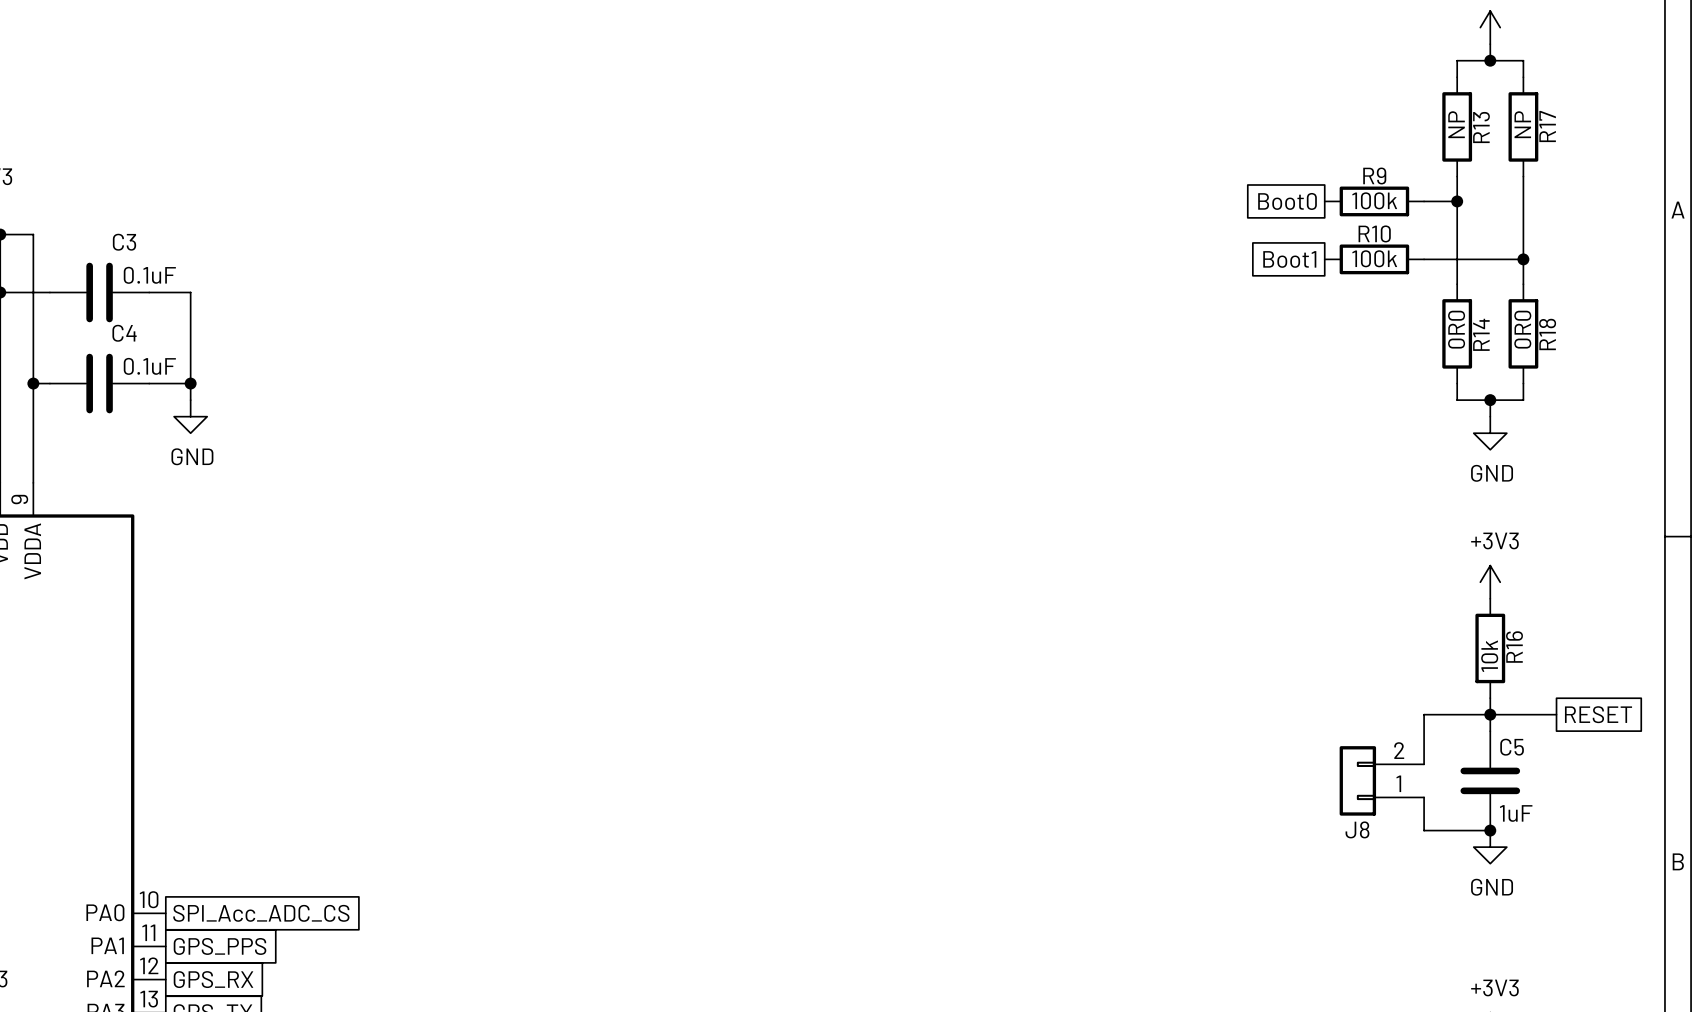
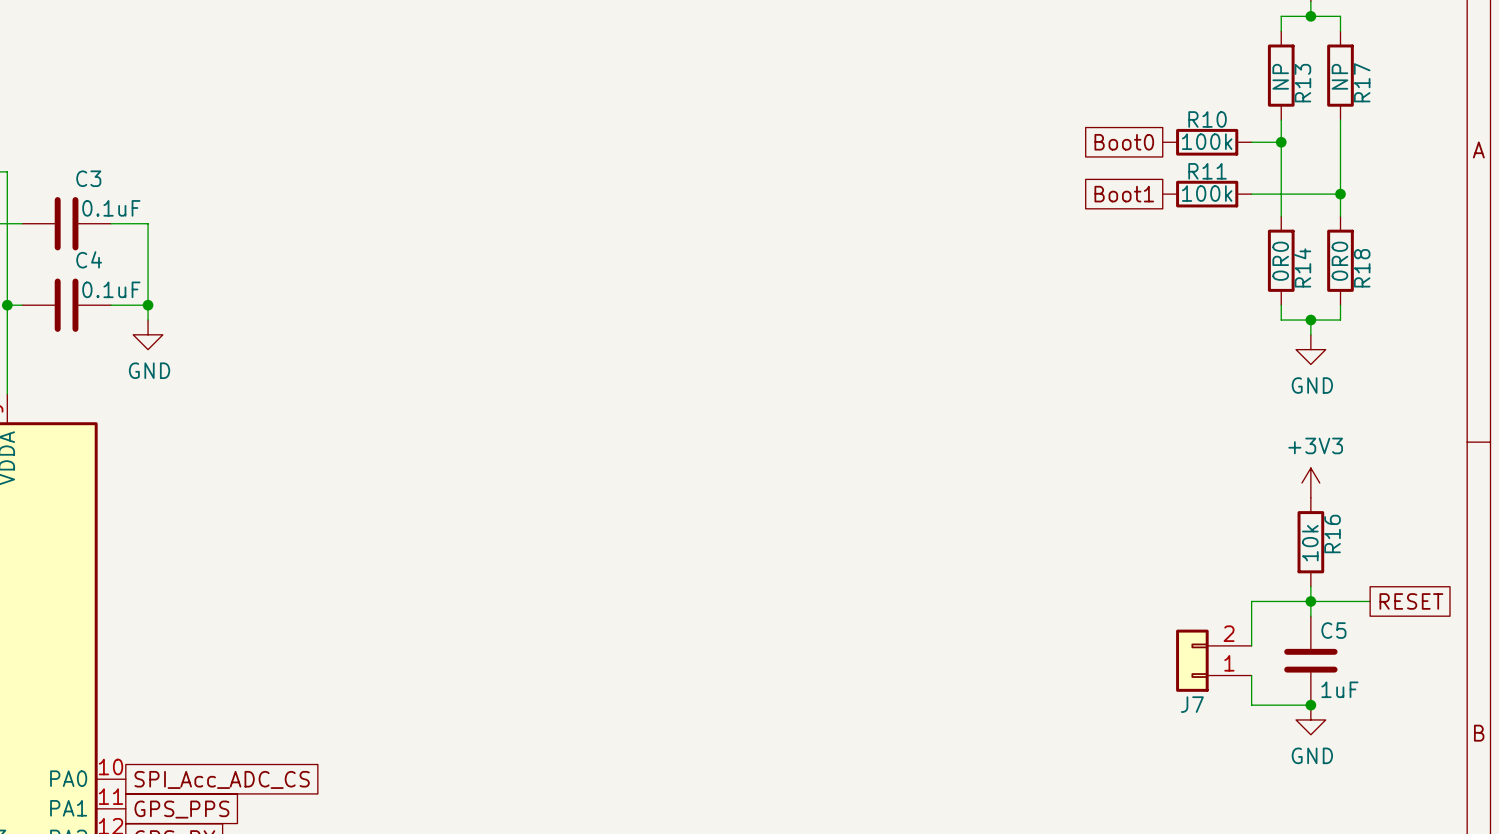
R9 name: R9 (1374, 176) -> R10 (1207, 119)
R10 name: R10 (1374, 233) -> R11 (1207, 171)
J8 name: J8 (1357, 829) -> J7 (1192, 704)

